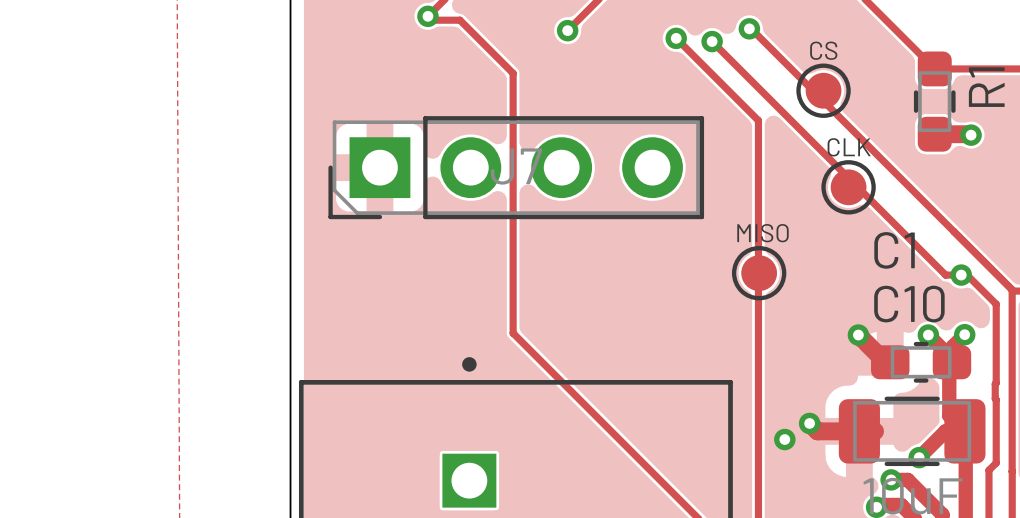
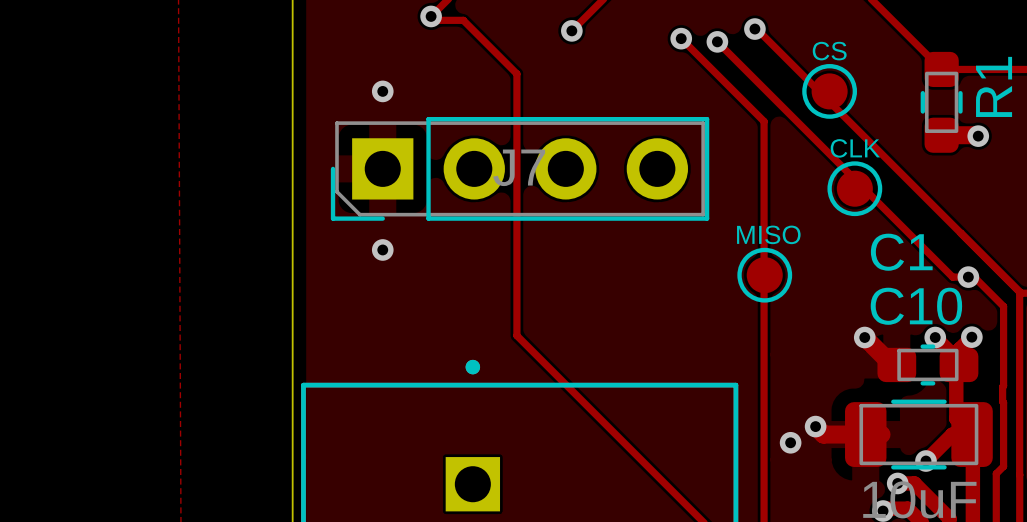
via: none -> (382, 91)
via: none -> (382, 249)

